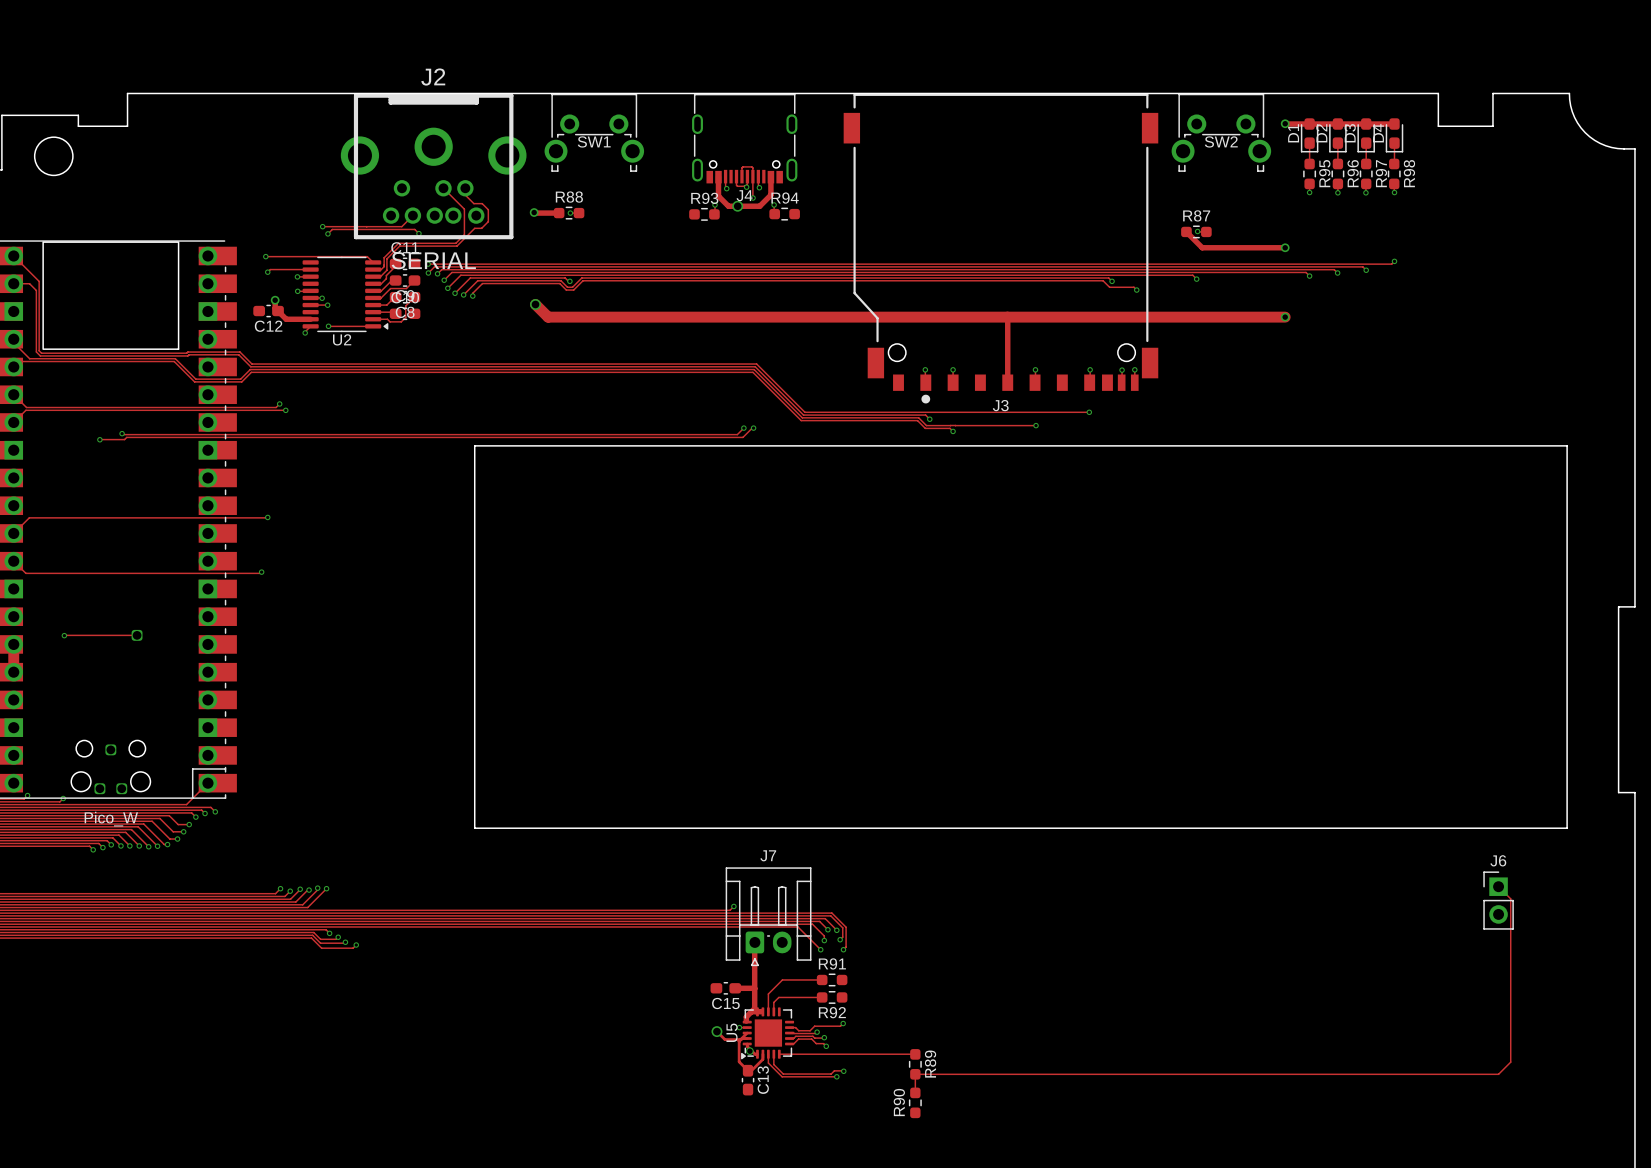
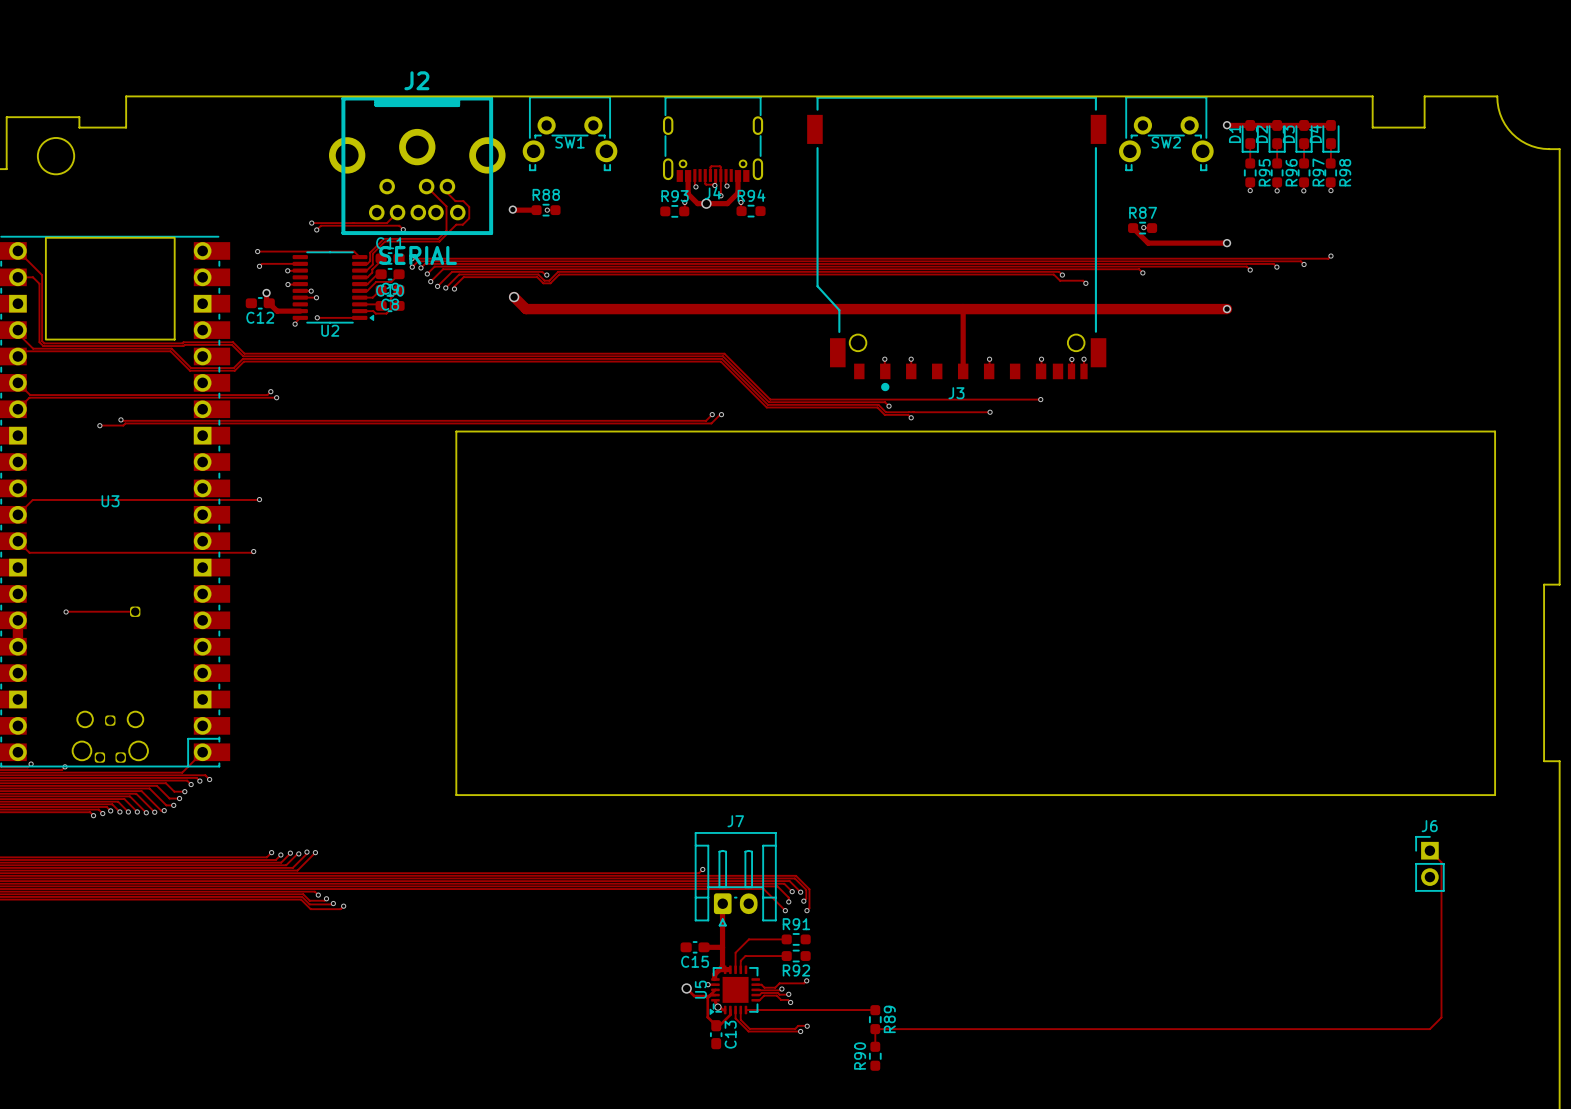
U3 name: none -> U3 (110, 501)
U3 value: Pico_W (111, 819) -> none

